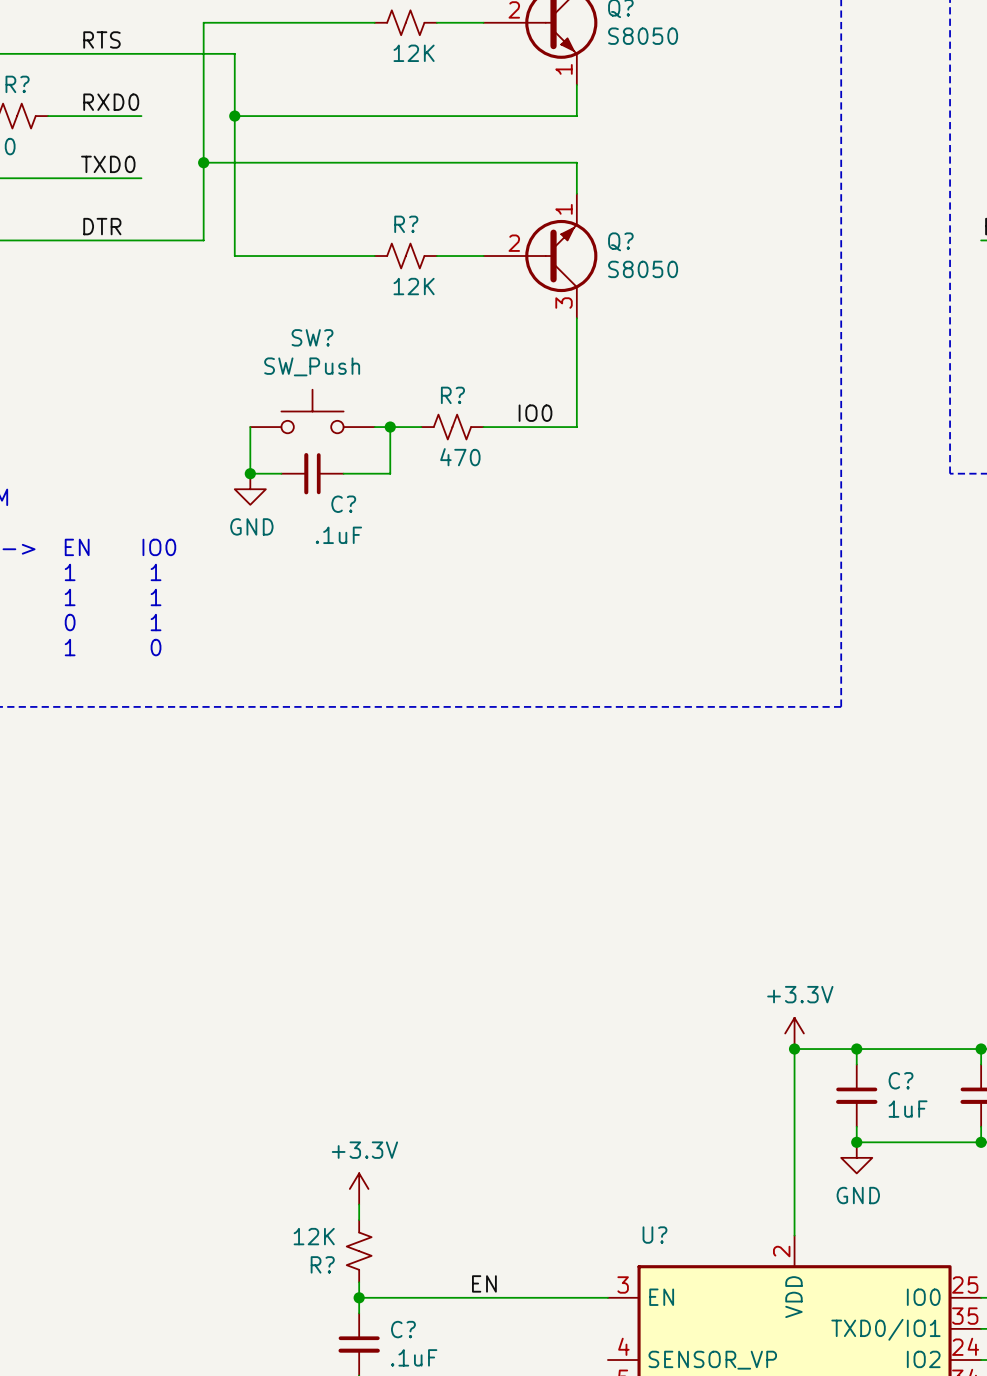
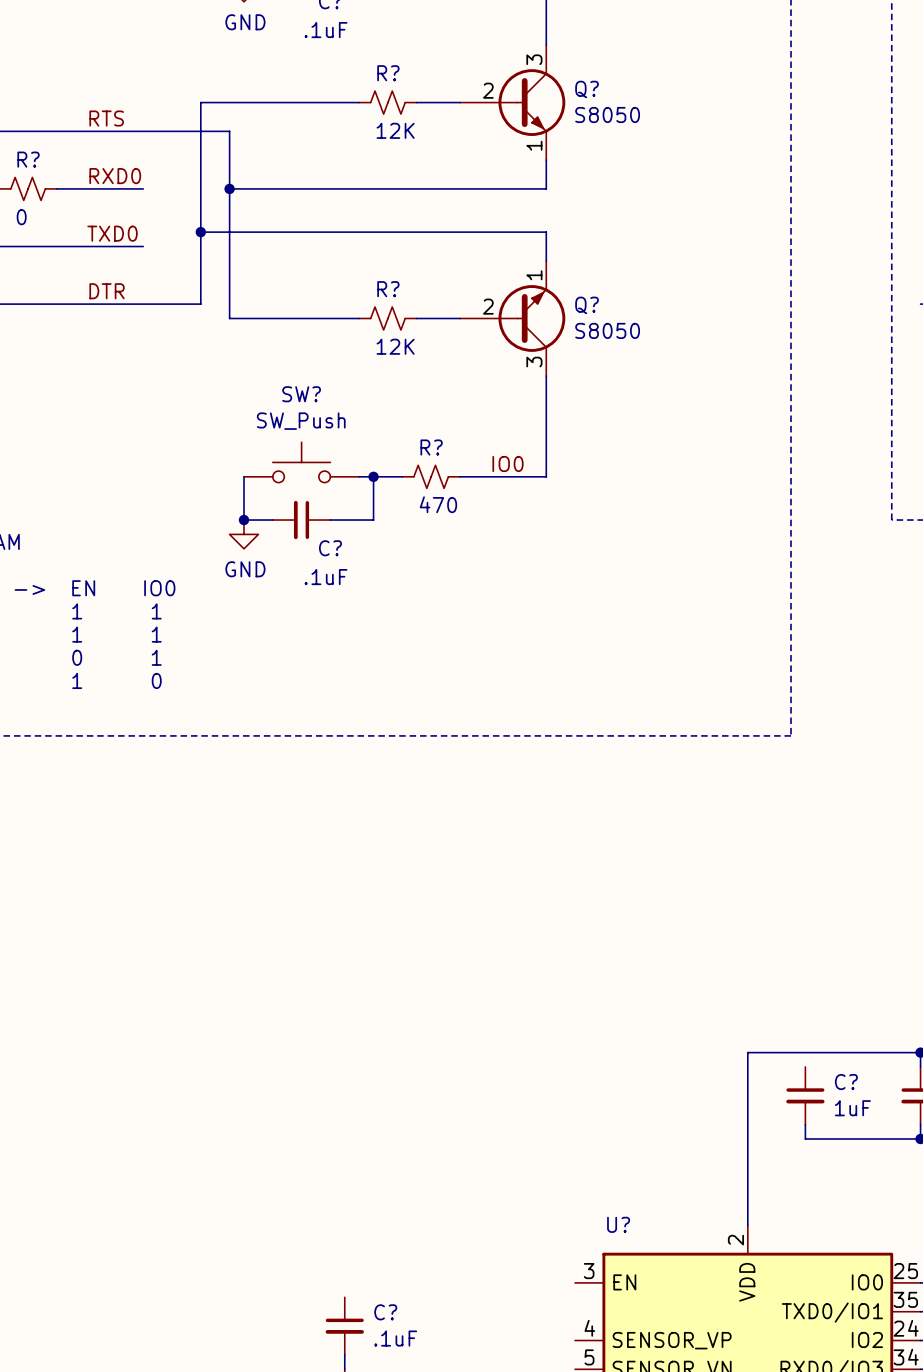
power symbol: +3.3V (794, 1033) -> none
junction: (794, 1049) -> none
wire: (856, 1049) (856, 1064) -> none
junction: (856, 1049) -> none
junction: (856, 1142) -> none
power symbol: GND (856, 1157) -> none
power symbol: +3.3V (359, 1188) -> none
wire: (359, 1204) (359, 1220) -> none
R?: 12K (359, 1251) -> none
wire: (359, 1282) (359, 1313) -> none
label: EN (484, 1283) -> none
wire: (359, 1297) (607, 1297) -> none
junction: (359, 1297) -> none

